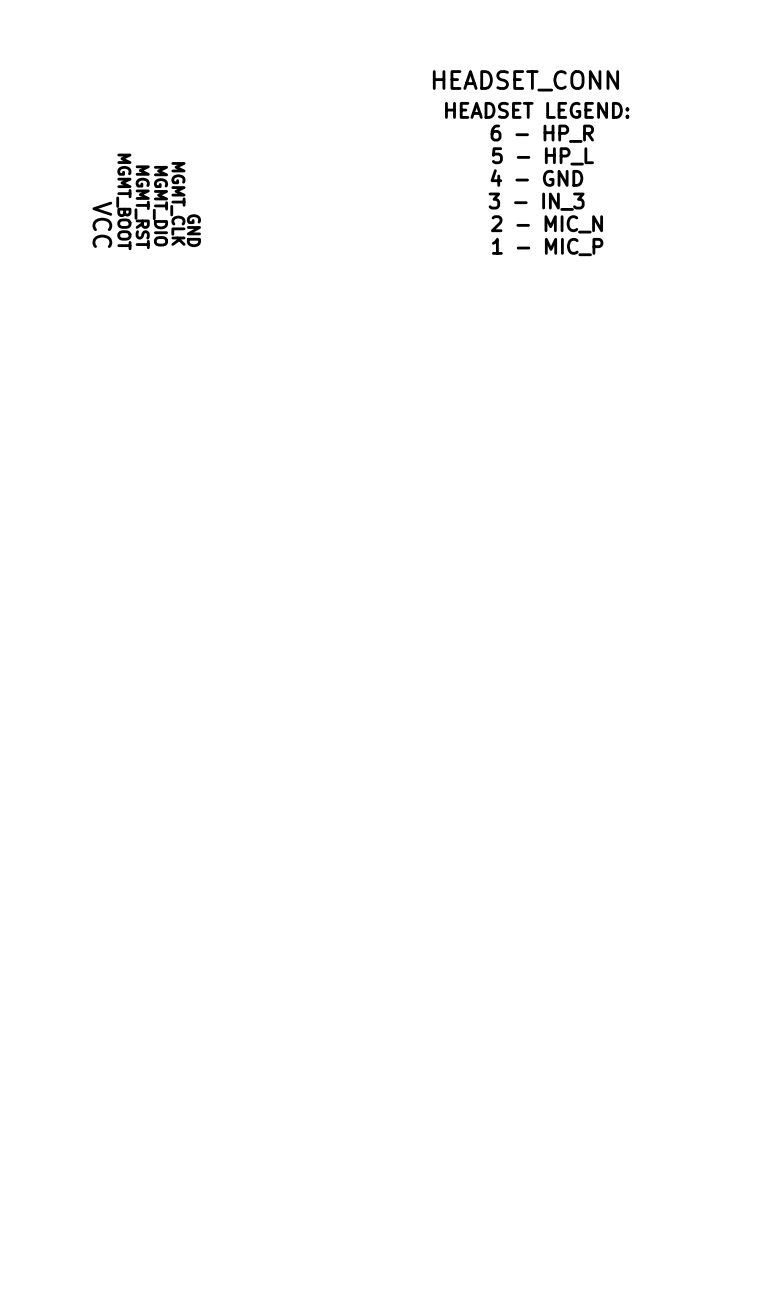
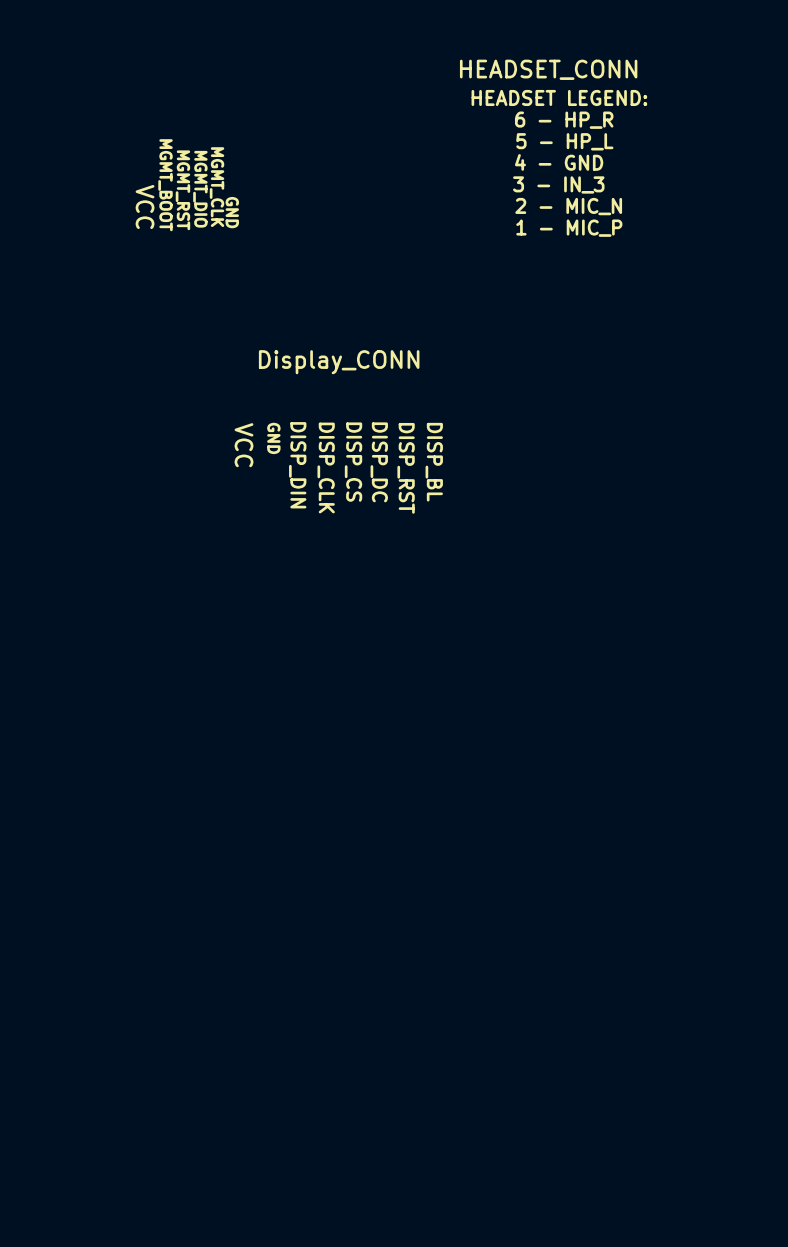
text: none -> Display_CONN (339, 362)
text: none -> GND (273, 438)
text: none -> VCC (244, 445)
text: none -> DISP_CS (353, 462)
text: none -> DISP_DC (379, 462)
text: none -> DISP_BL (434, 462)
text: none -> DISP_DIN (297, 465)
text: none -> DISP_CLK (326, 468)
text: none -> DISP_RST (406, 468)

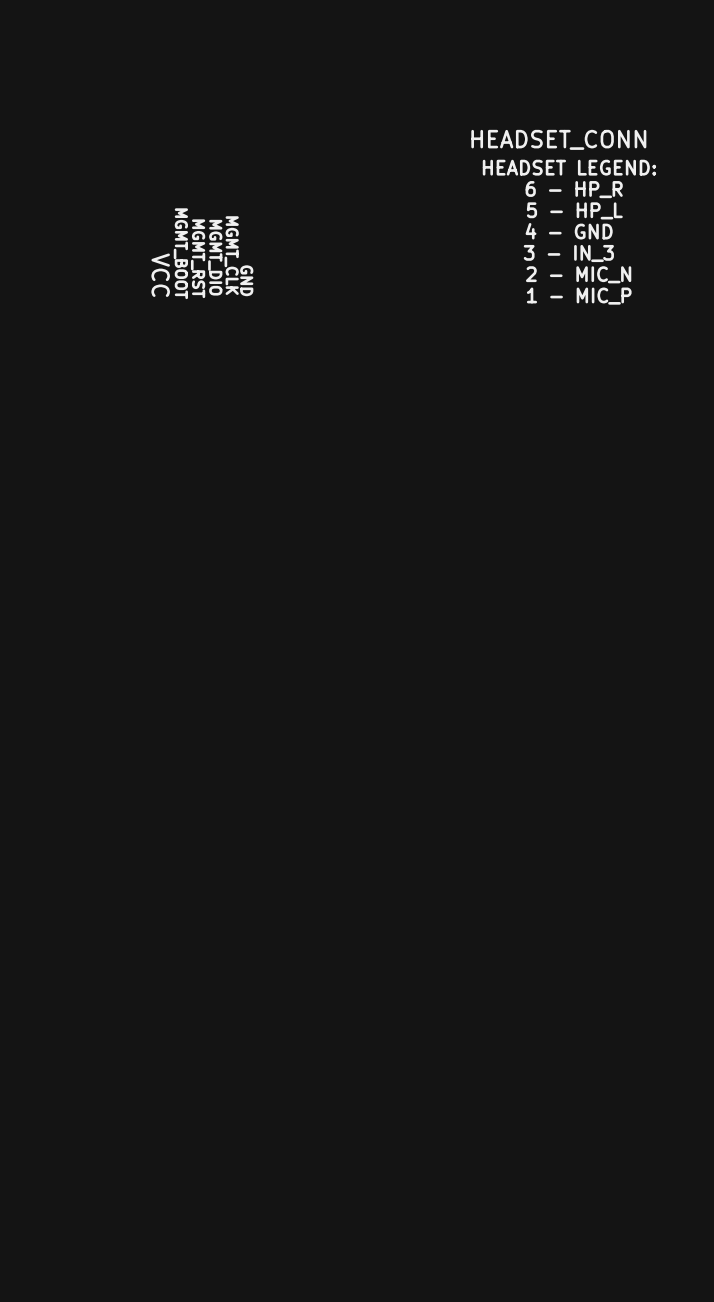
text: Display_CONN (339, 362) -> none
text: GND (273, 438) -> none
text: VCC (244, 445) -> none
text: DISP_CS (353, 462) -> none
text: DISP_DC (379, 462) -> none
text: DISP_BL (434, 462) -> none
text: DISP_DIN (297, 465) -> none
text: DISP_CLK (326, 468) -> none
text: DISP_RST (406, 468) -> none

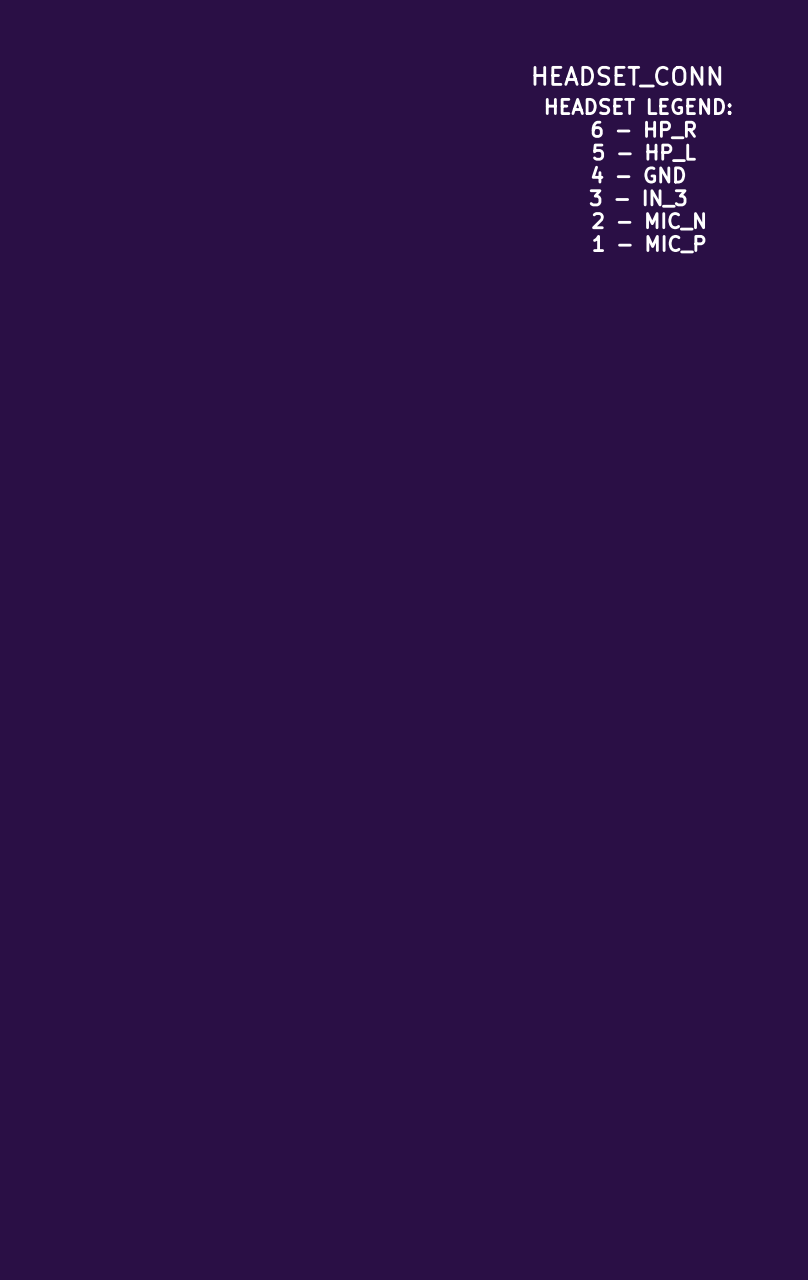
text: MGMT_BOOT (180, 253) -> none
text: MGMT_CLK (231, 255) -> none
text: MGMT_DIO (215, 257) -> none
text: MGMT_RST (198, 258) -> none
text: VCC (160, 275) -> none
text: GND (246, 280) -> none

